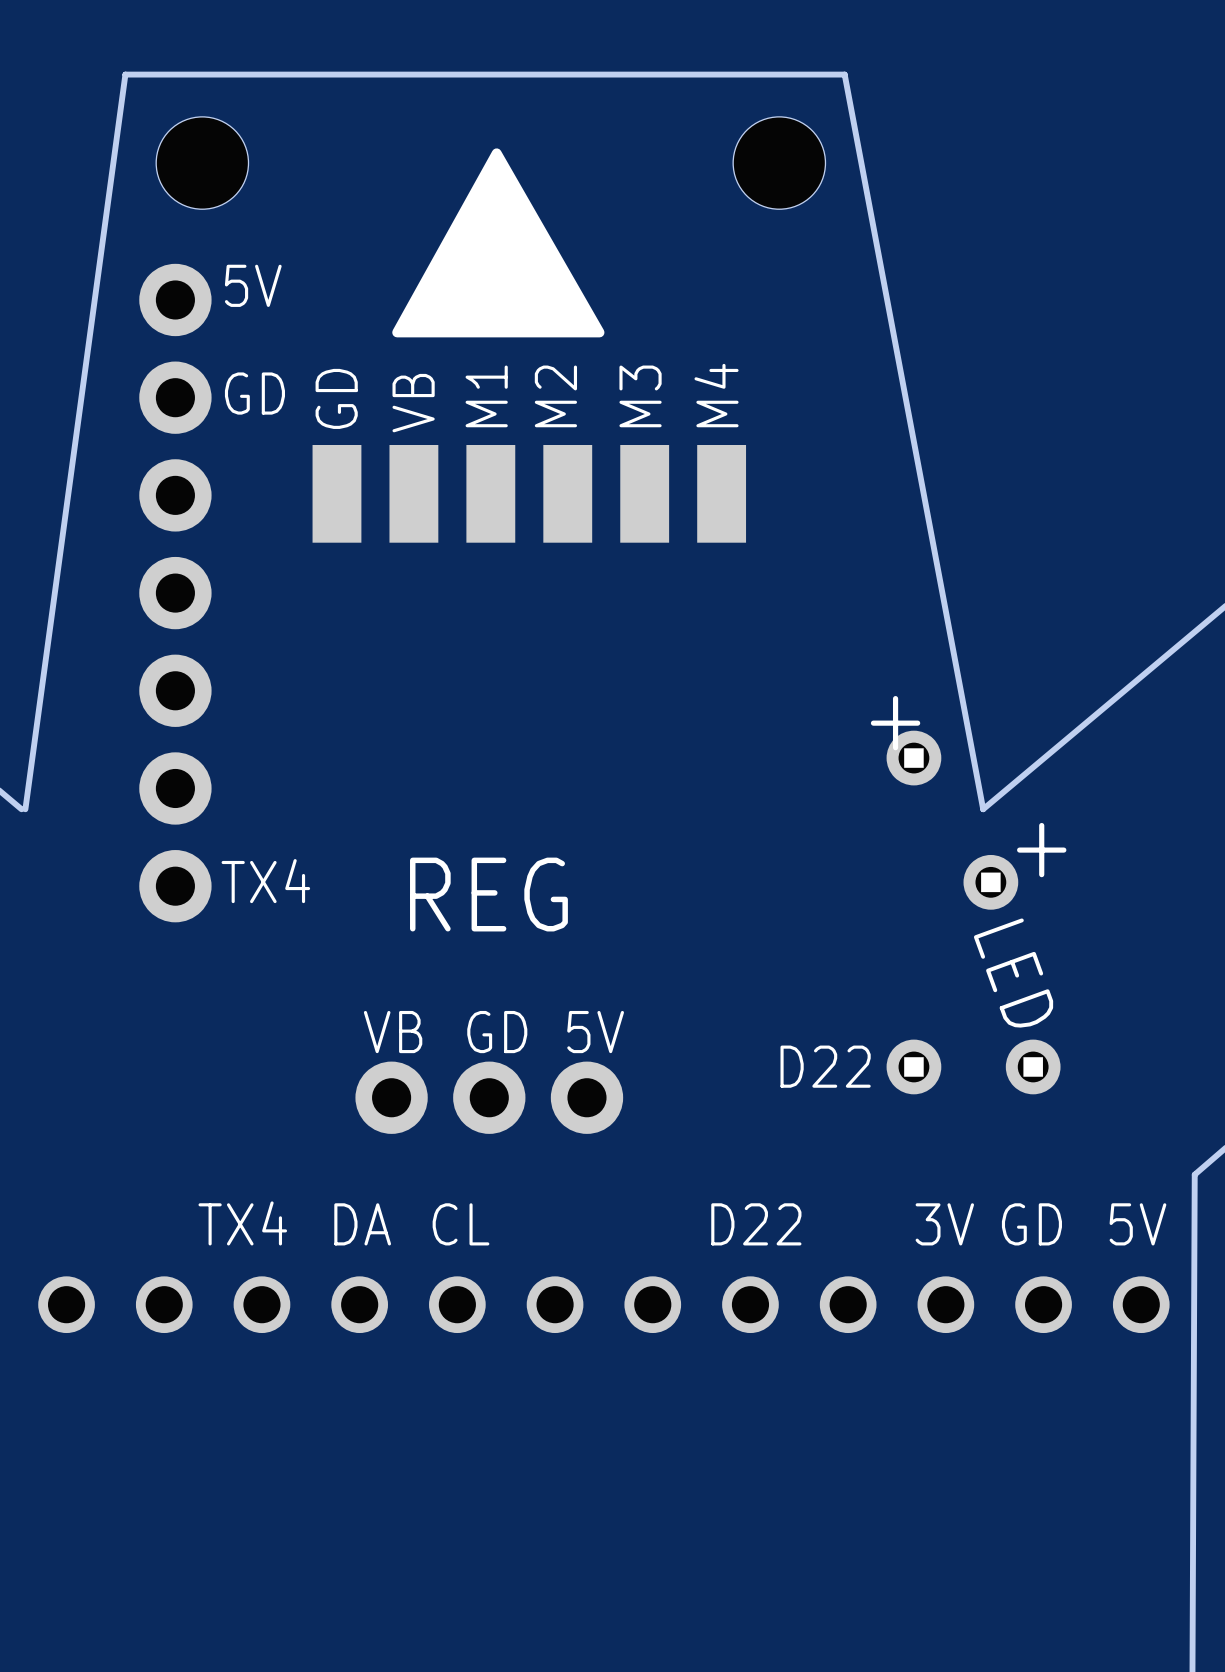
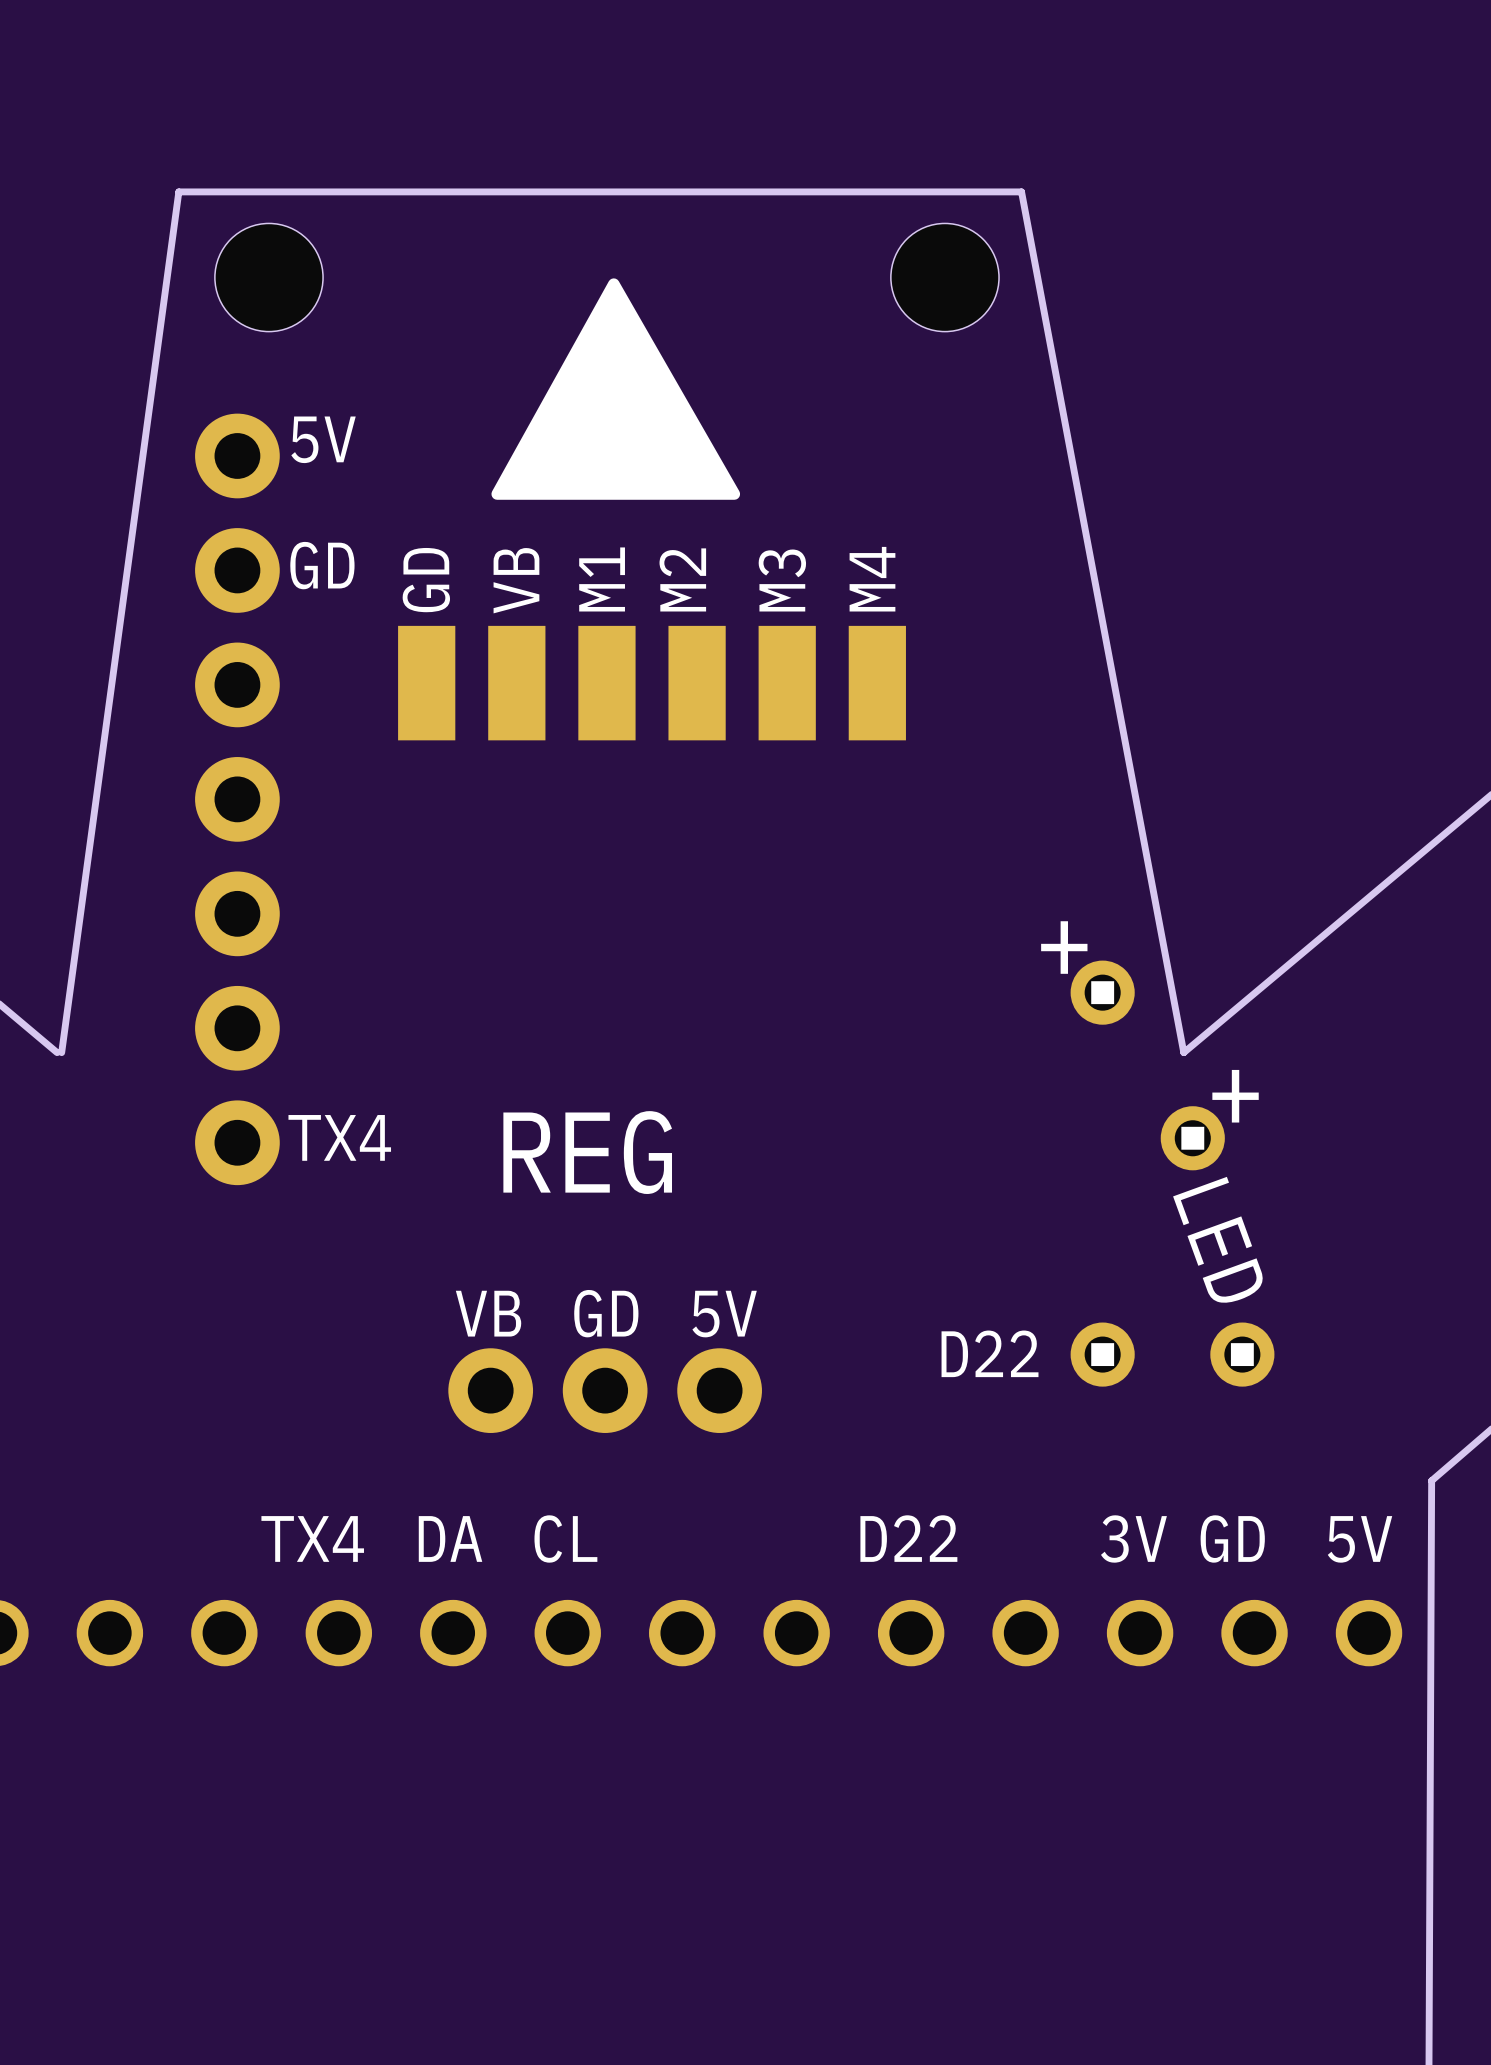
hole position: (202, 163) -> (268, 277)
hole position: (779, 163) -> (944, 277)

